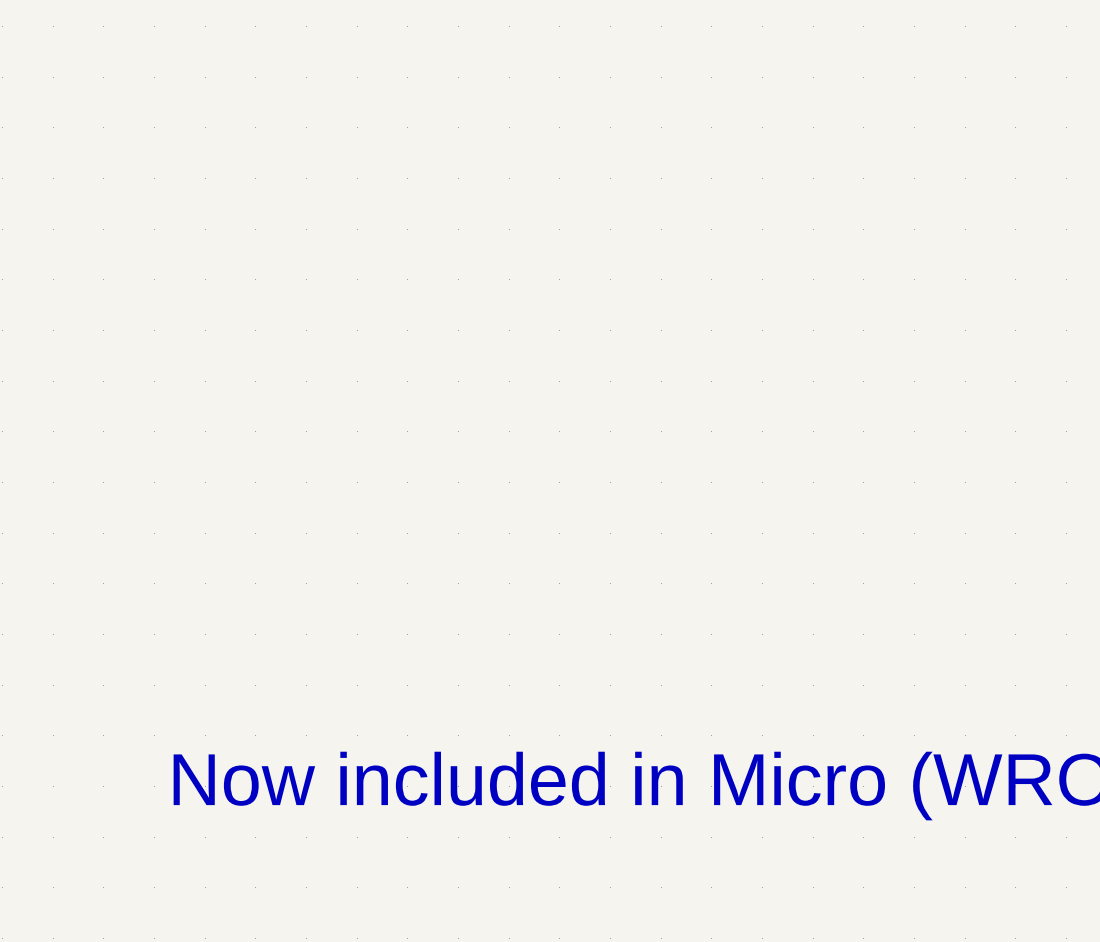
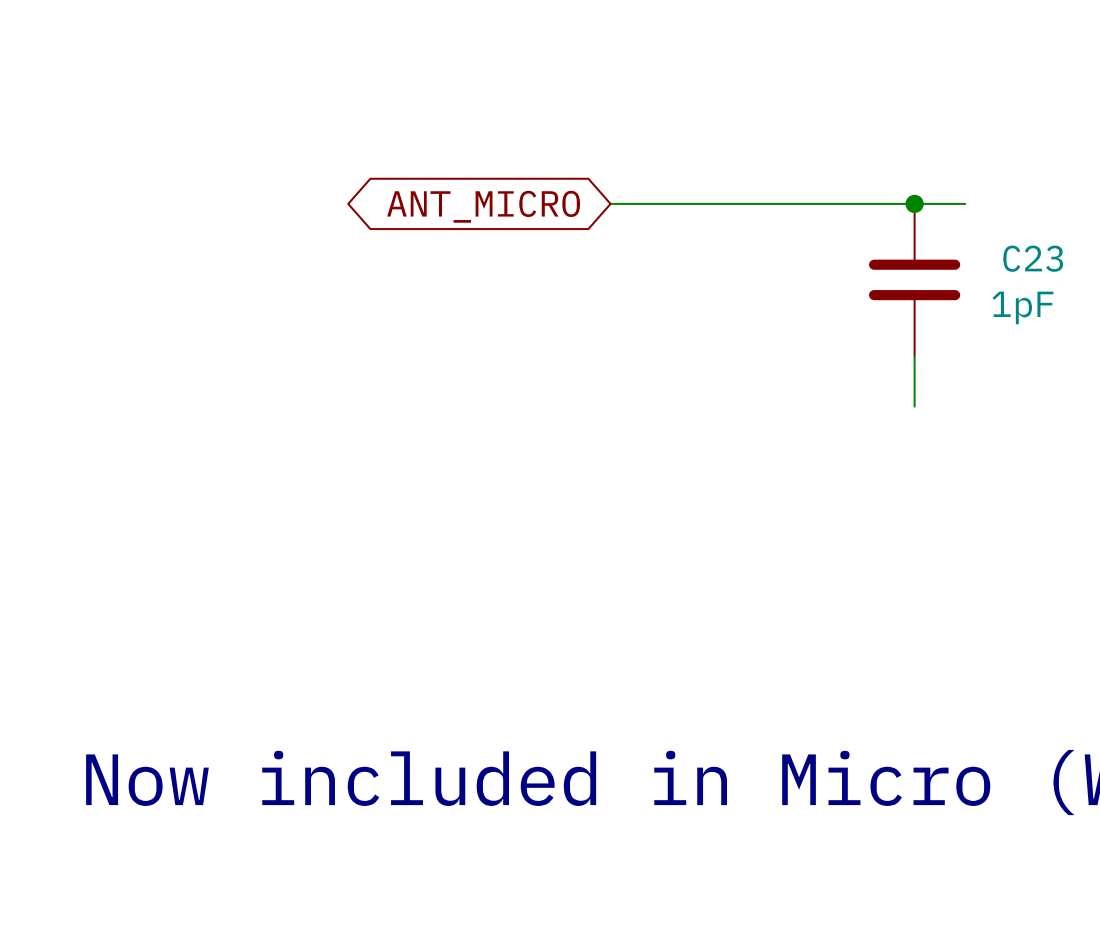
wire: none -> (610, 203) (965, 203)
junction: none -> (914, 203)
global label: none -> ANT_MICRO (483, 206)
C23: none -> 1pF (914, 279)
wire: none -> (914, 355) (914, 406)

